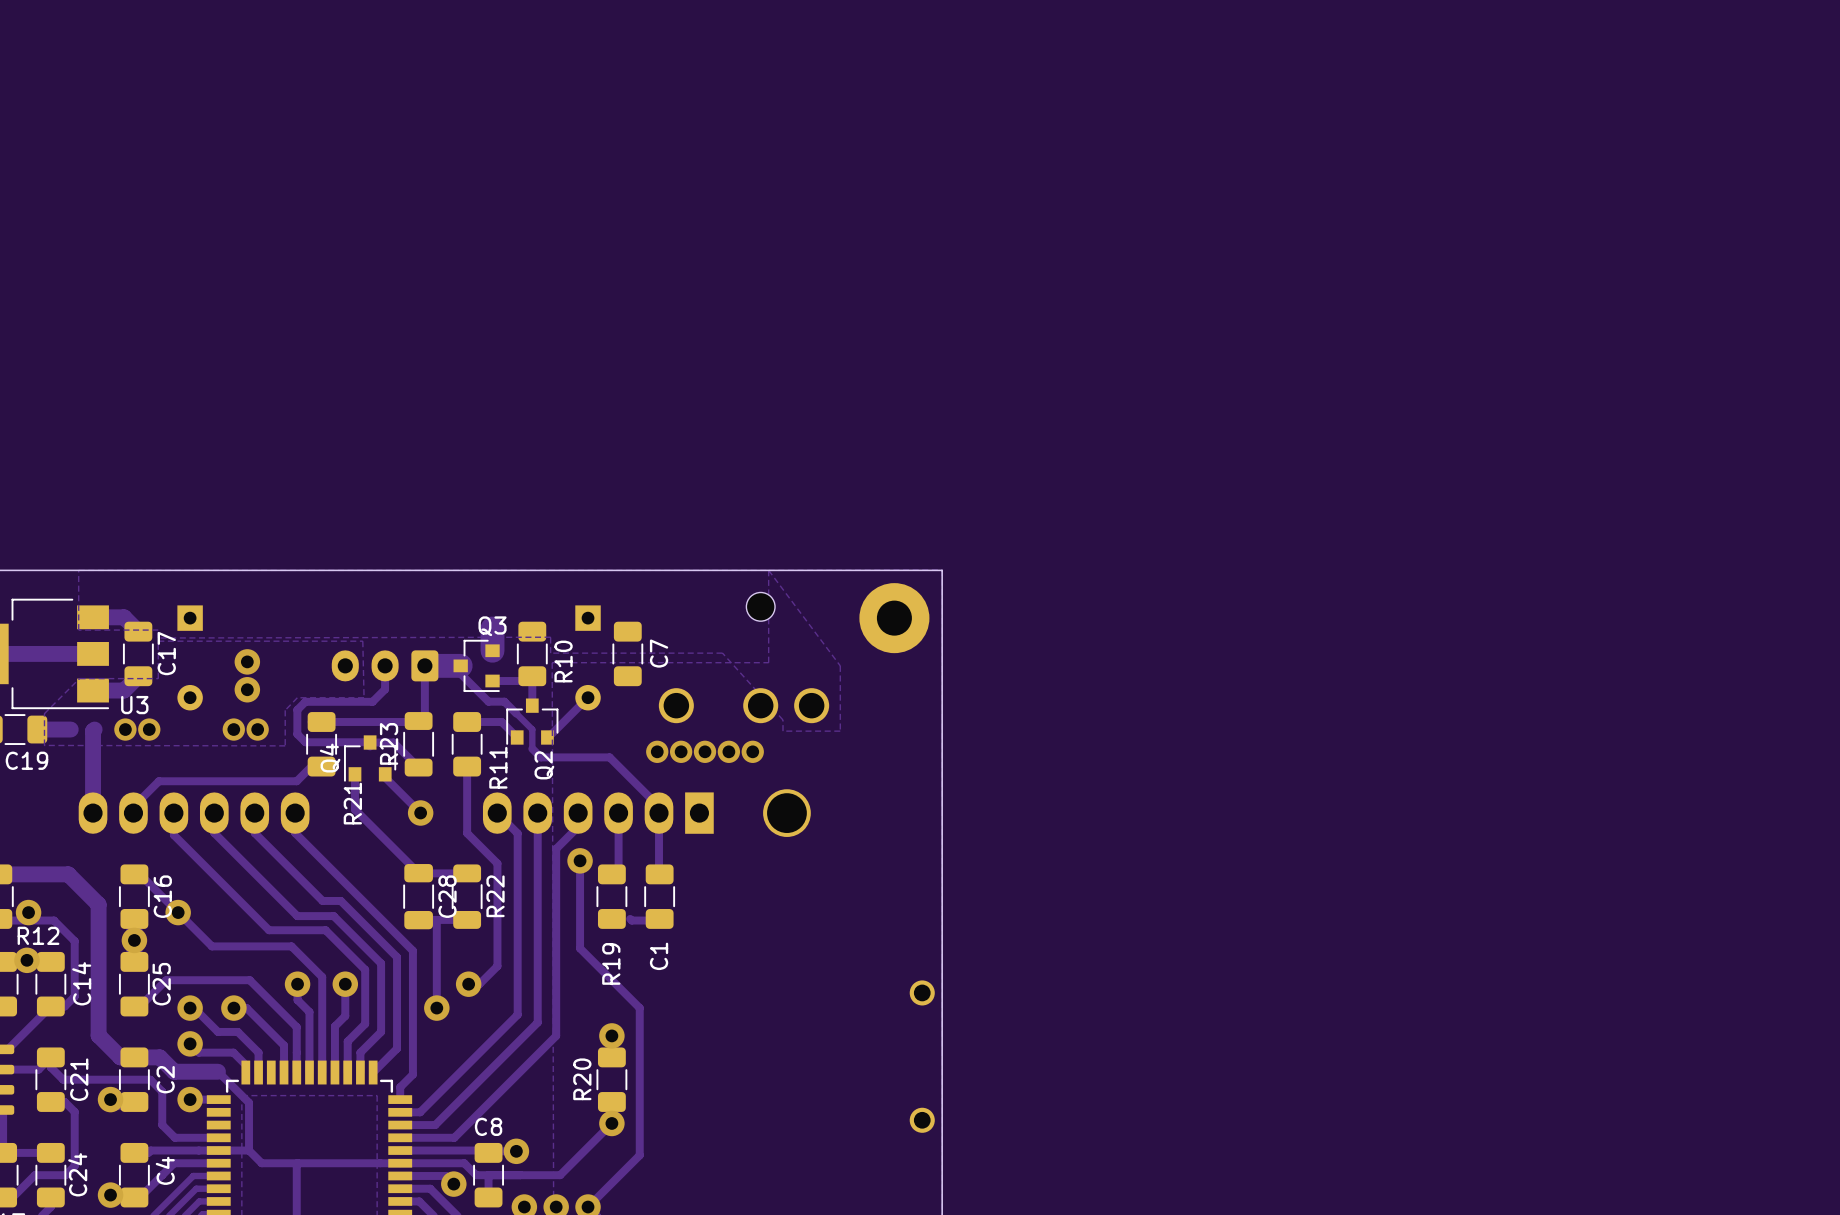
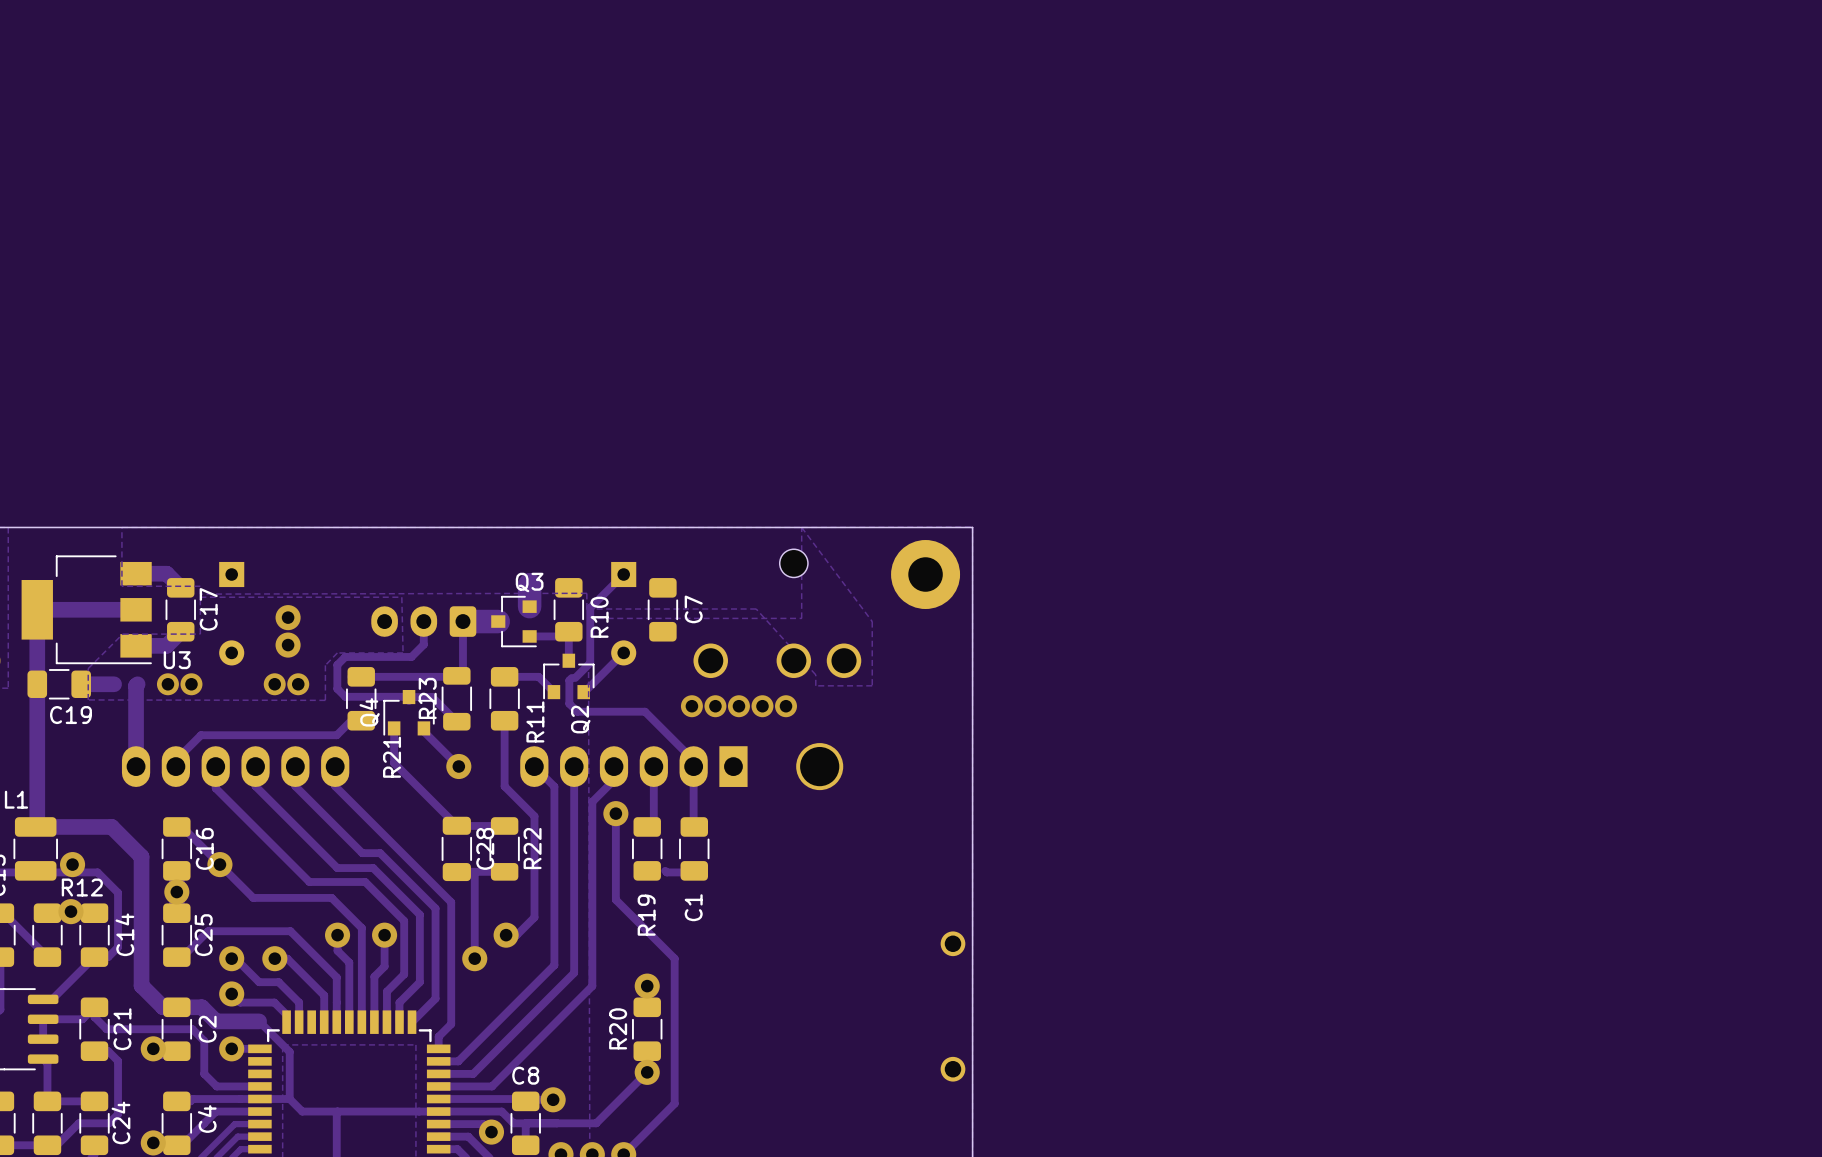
track: none -> (623, 574) (590, 607) (590, 662) (575, 677)
track: (460, 665) (460, 673) (488, 701) (504, 701) (532, 729) (532, 749) -> (571, 677) (569, 680) (569, 703)

